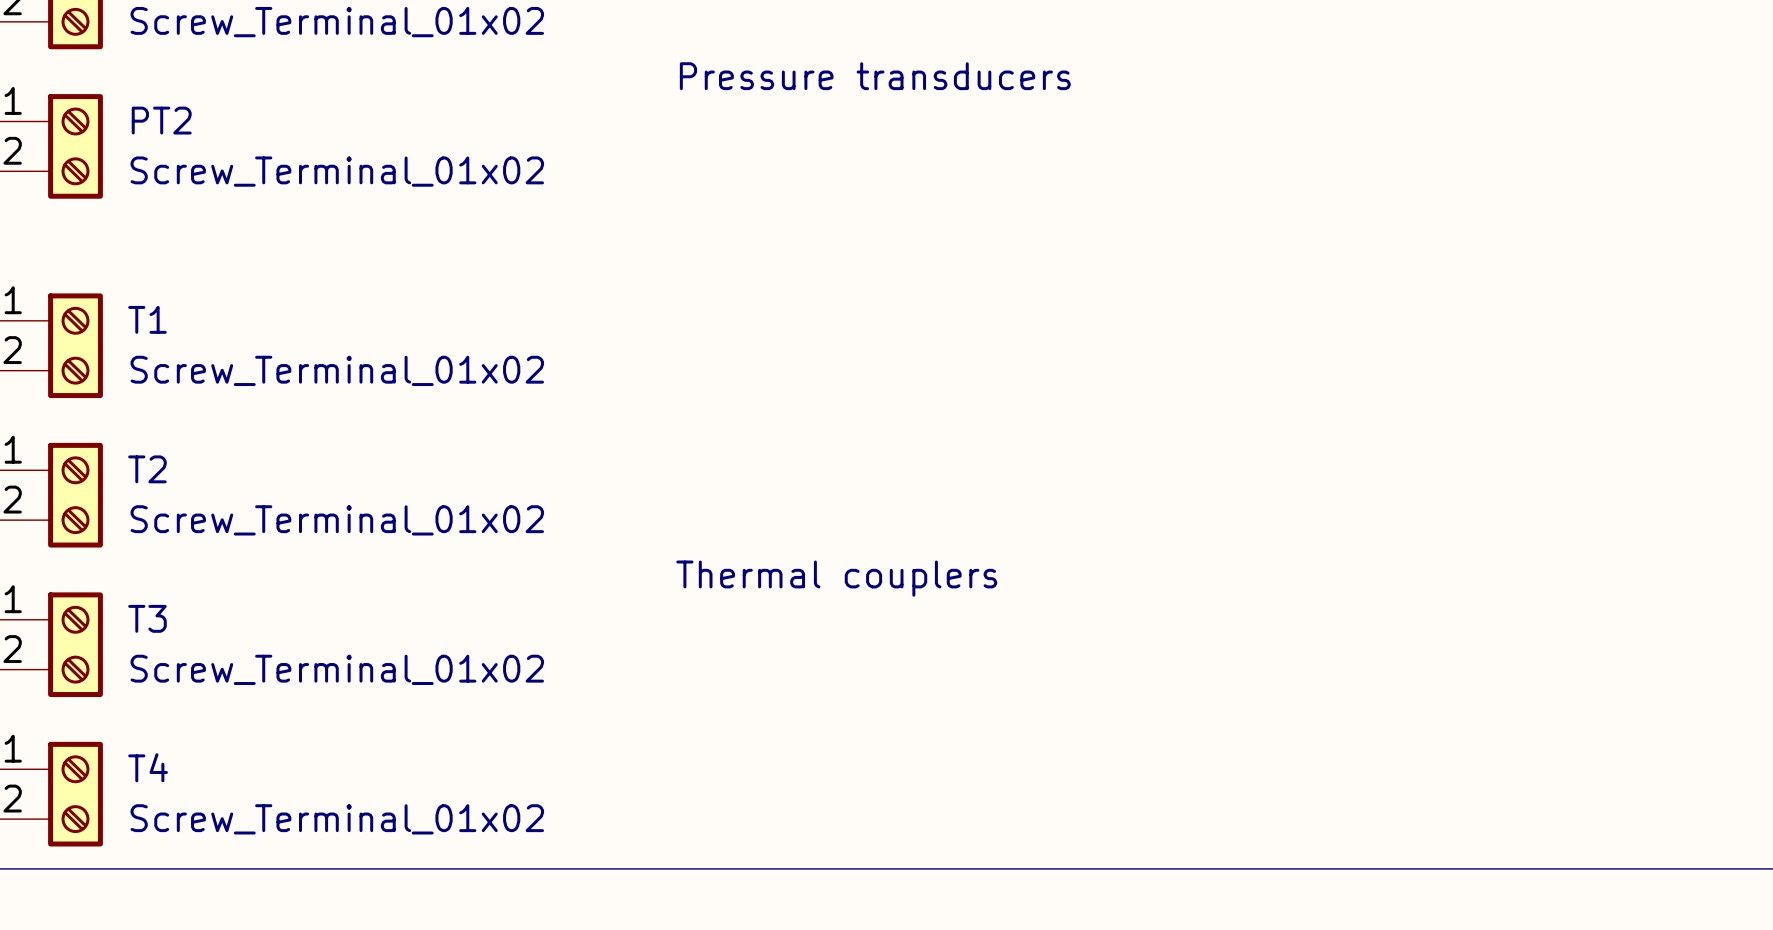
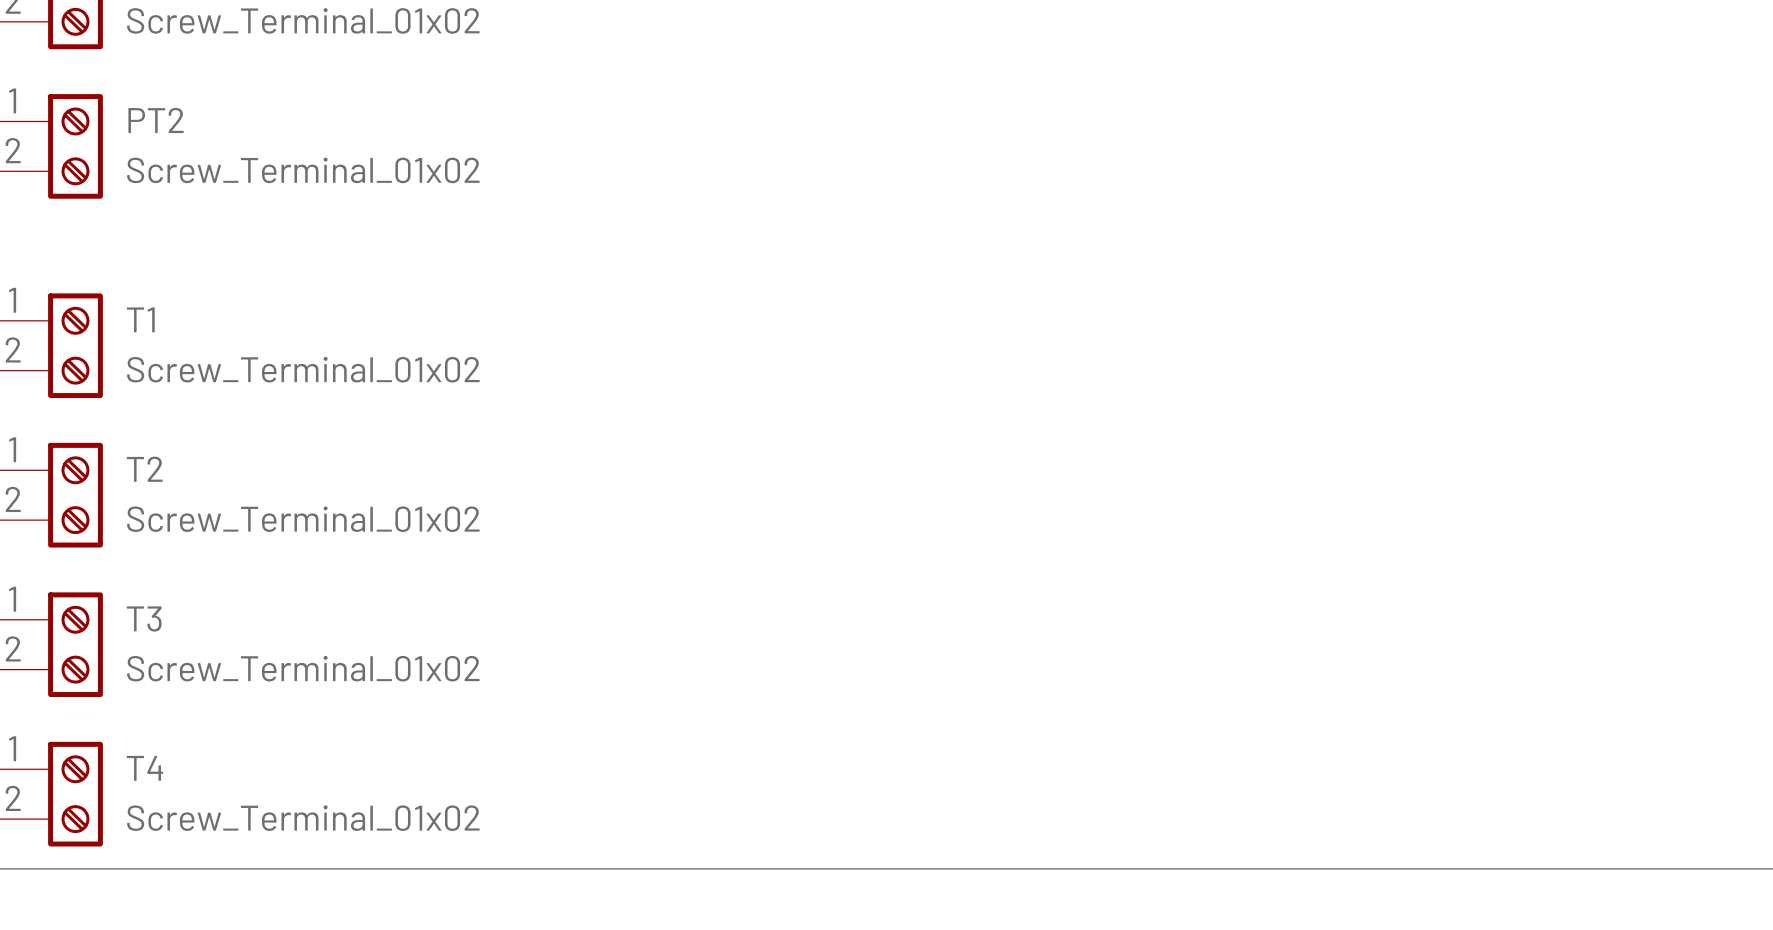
text: Pressure transducers (875, 76) -> none
text: Thermal couplers (836, 578) -> none

